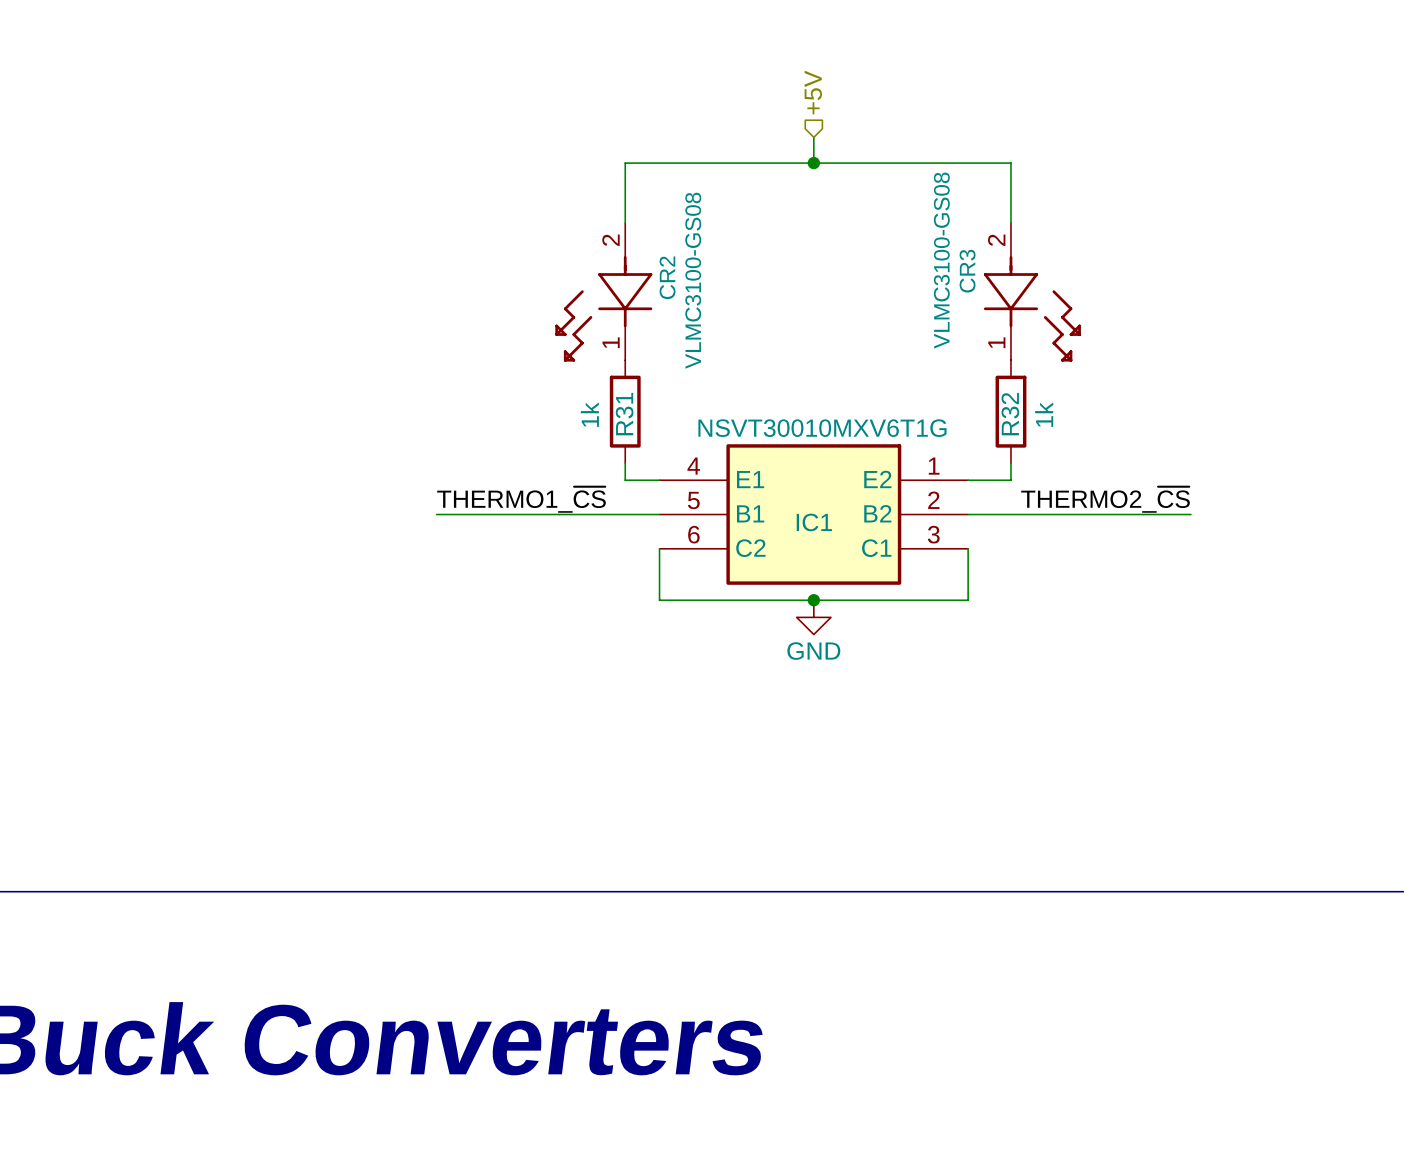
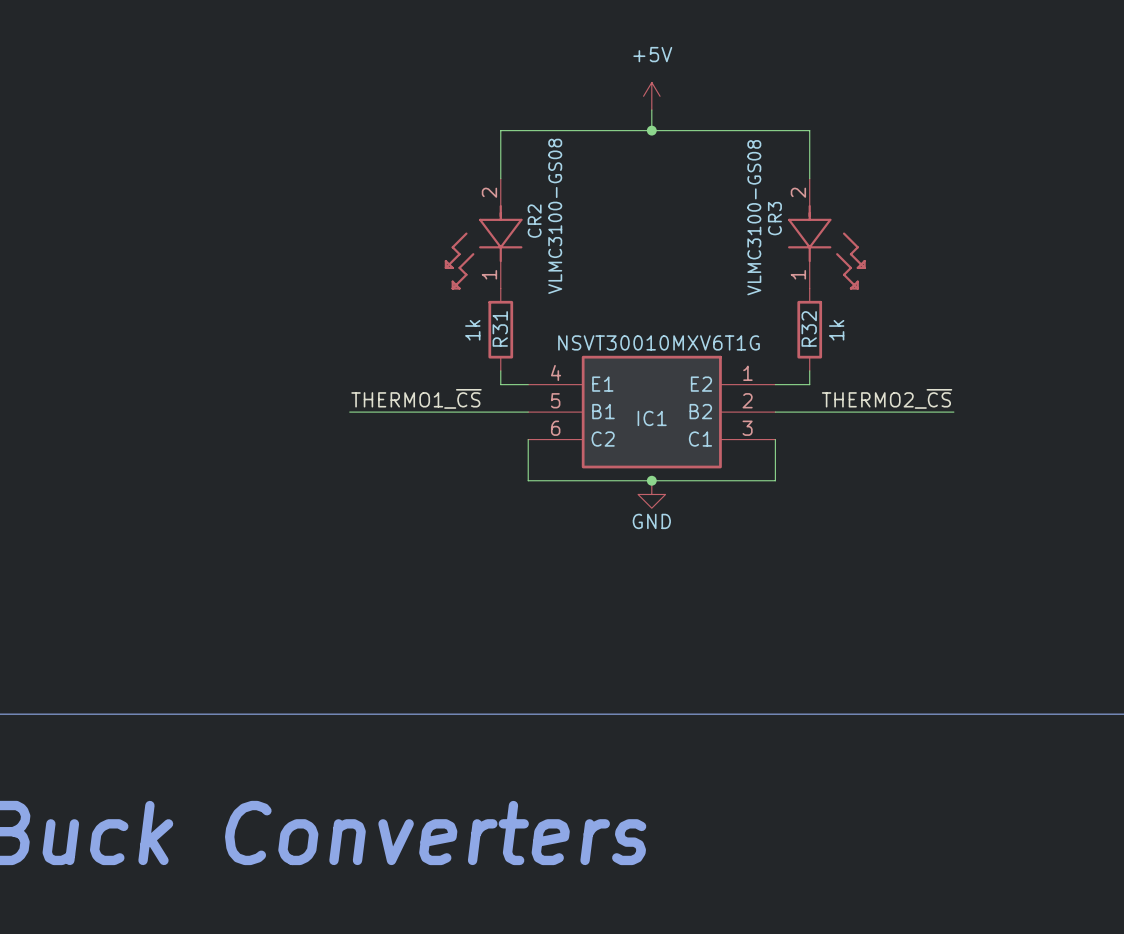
hierarchical label: +5V (813, 92) -> none
power symbol: none -> +5V (651, 96)

